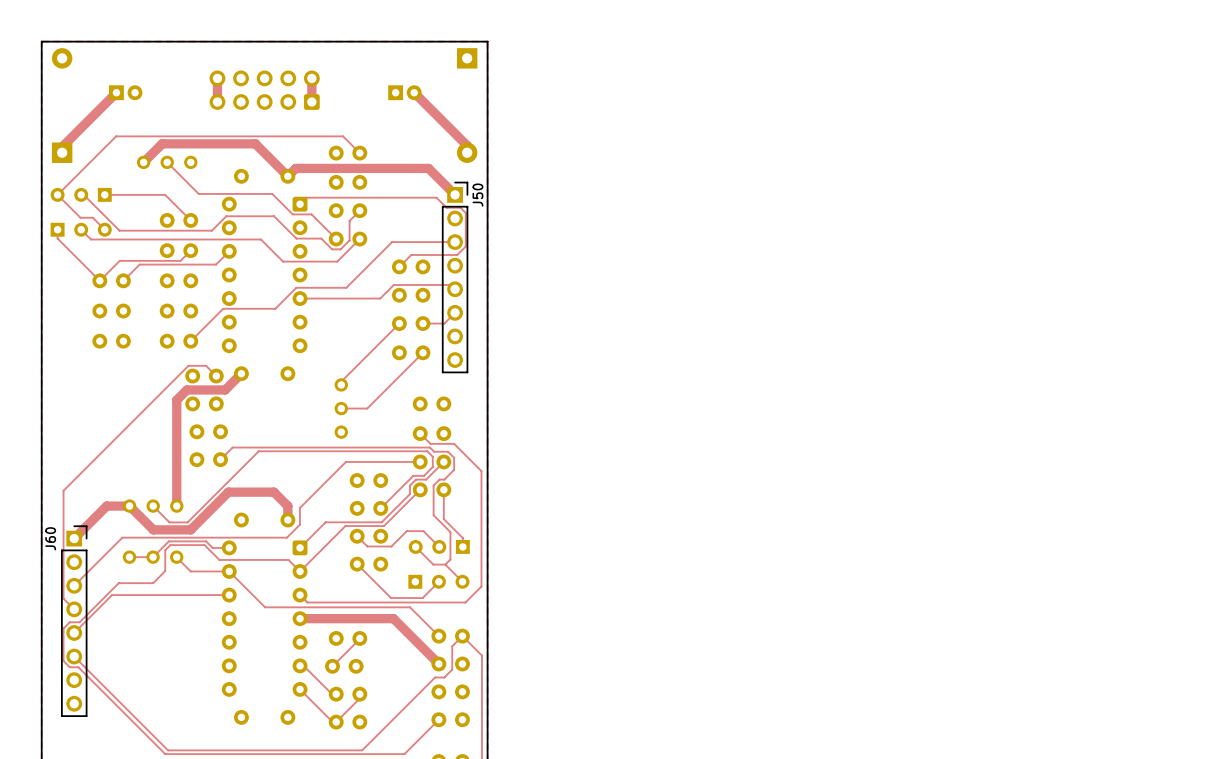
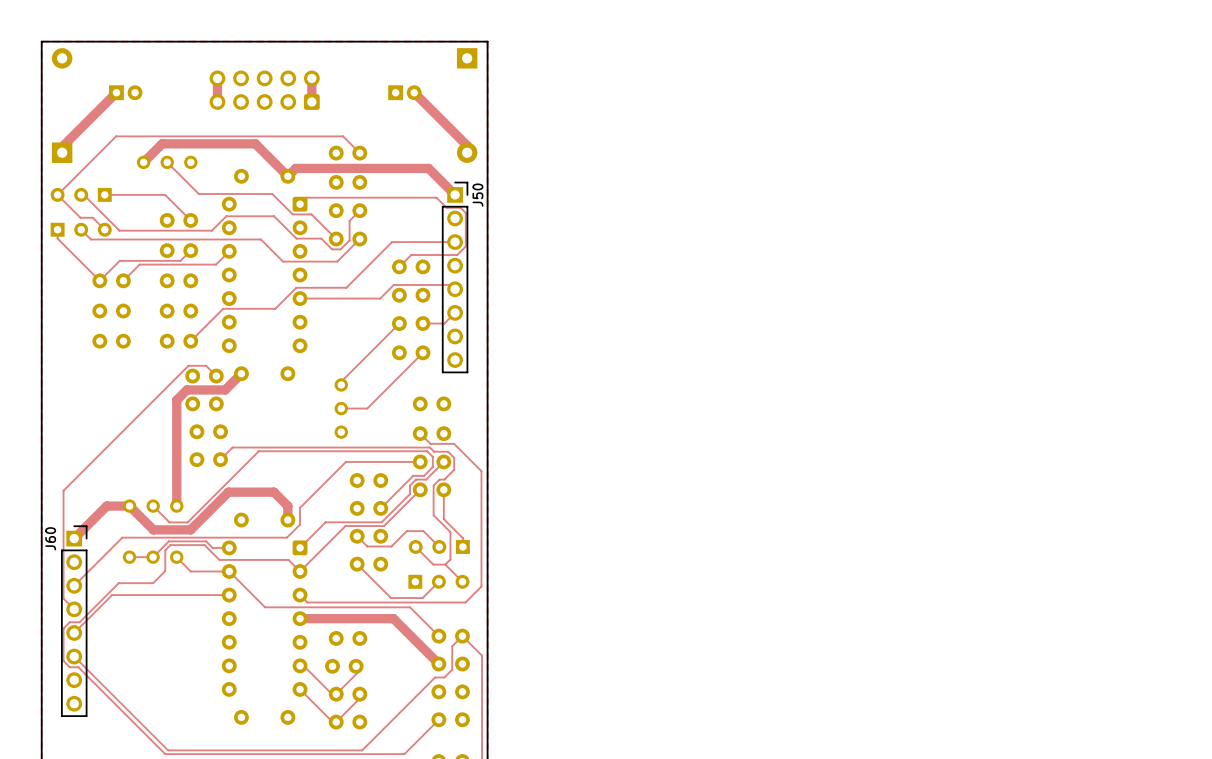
track: (359, 638) (332, 666) -> none
track: none -> (359, 666) (359, 670) (336, 694)

